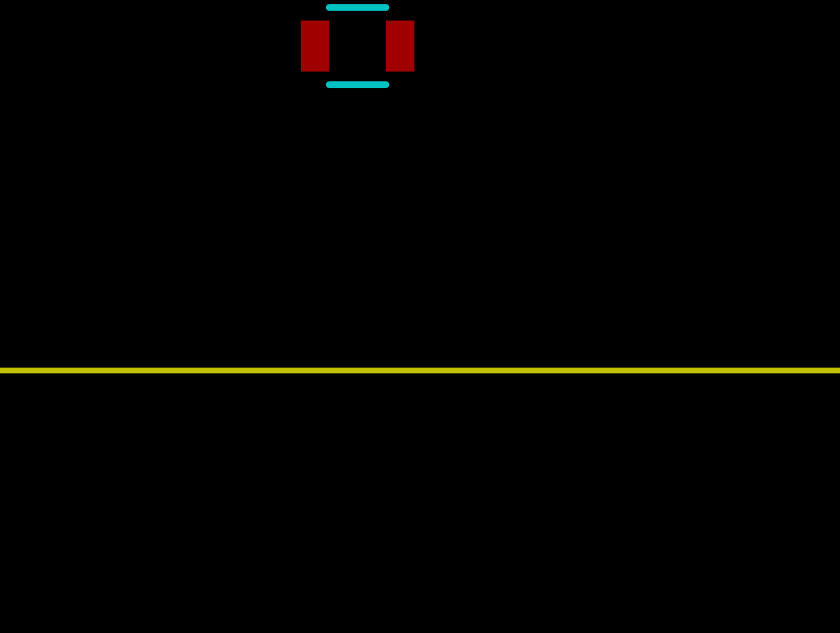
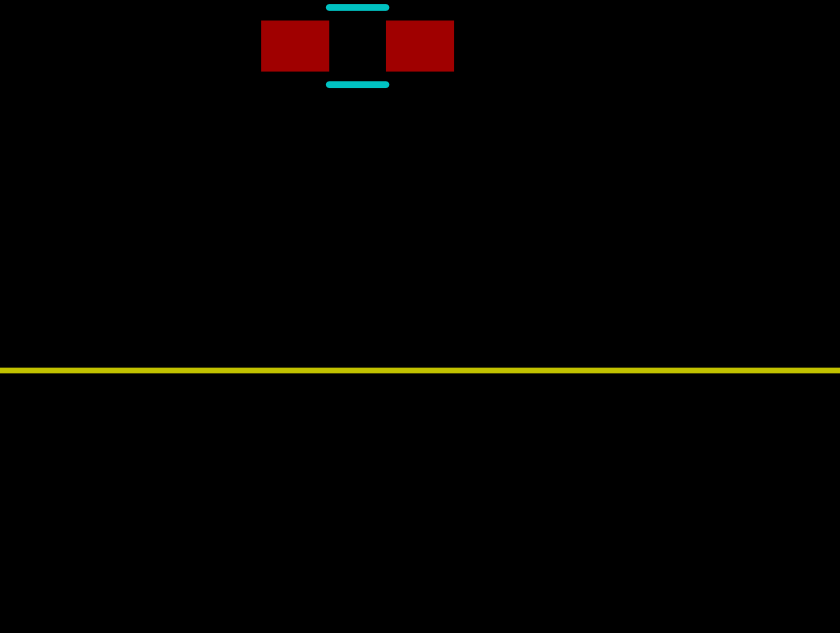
part footprint: [300, 4, 415, 89] -> [261, 4, 455, 89]

